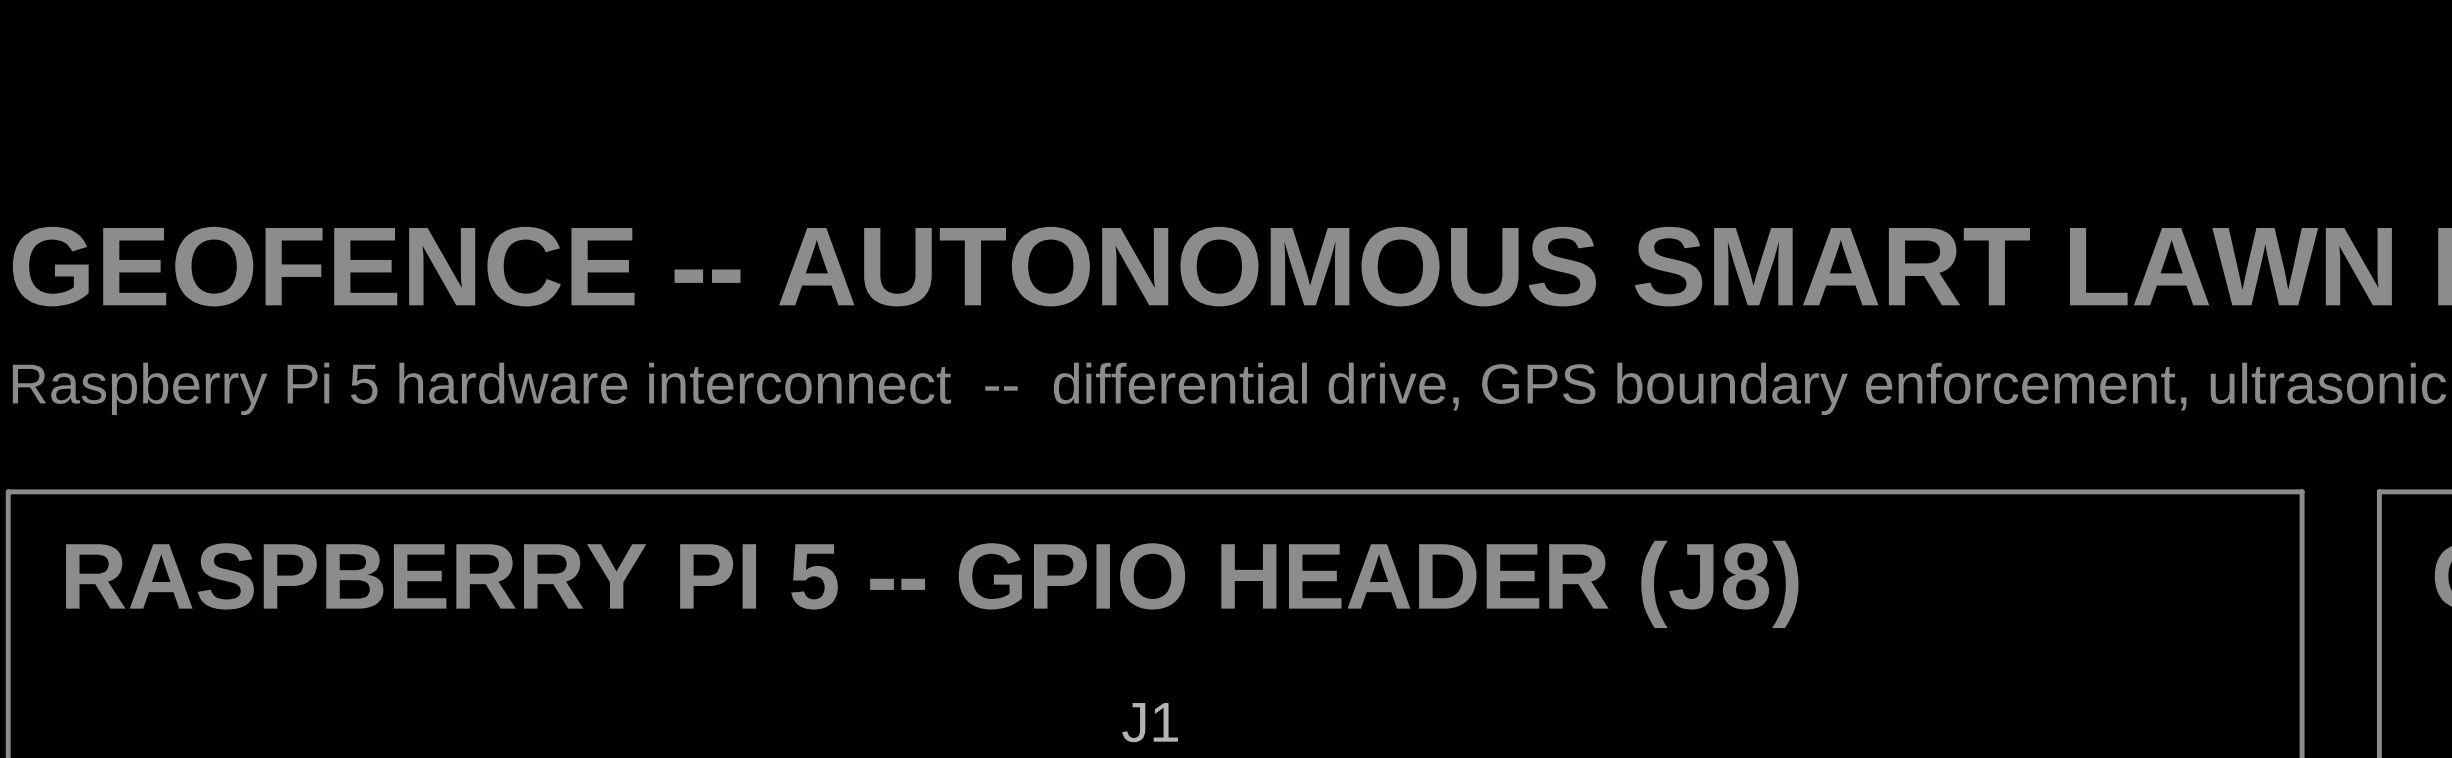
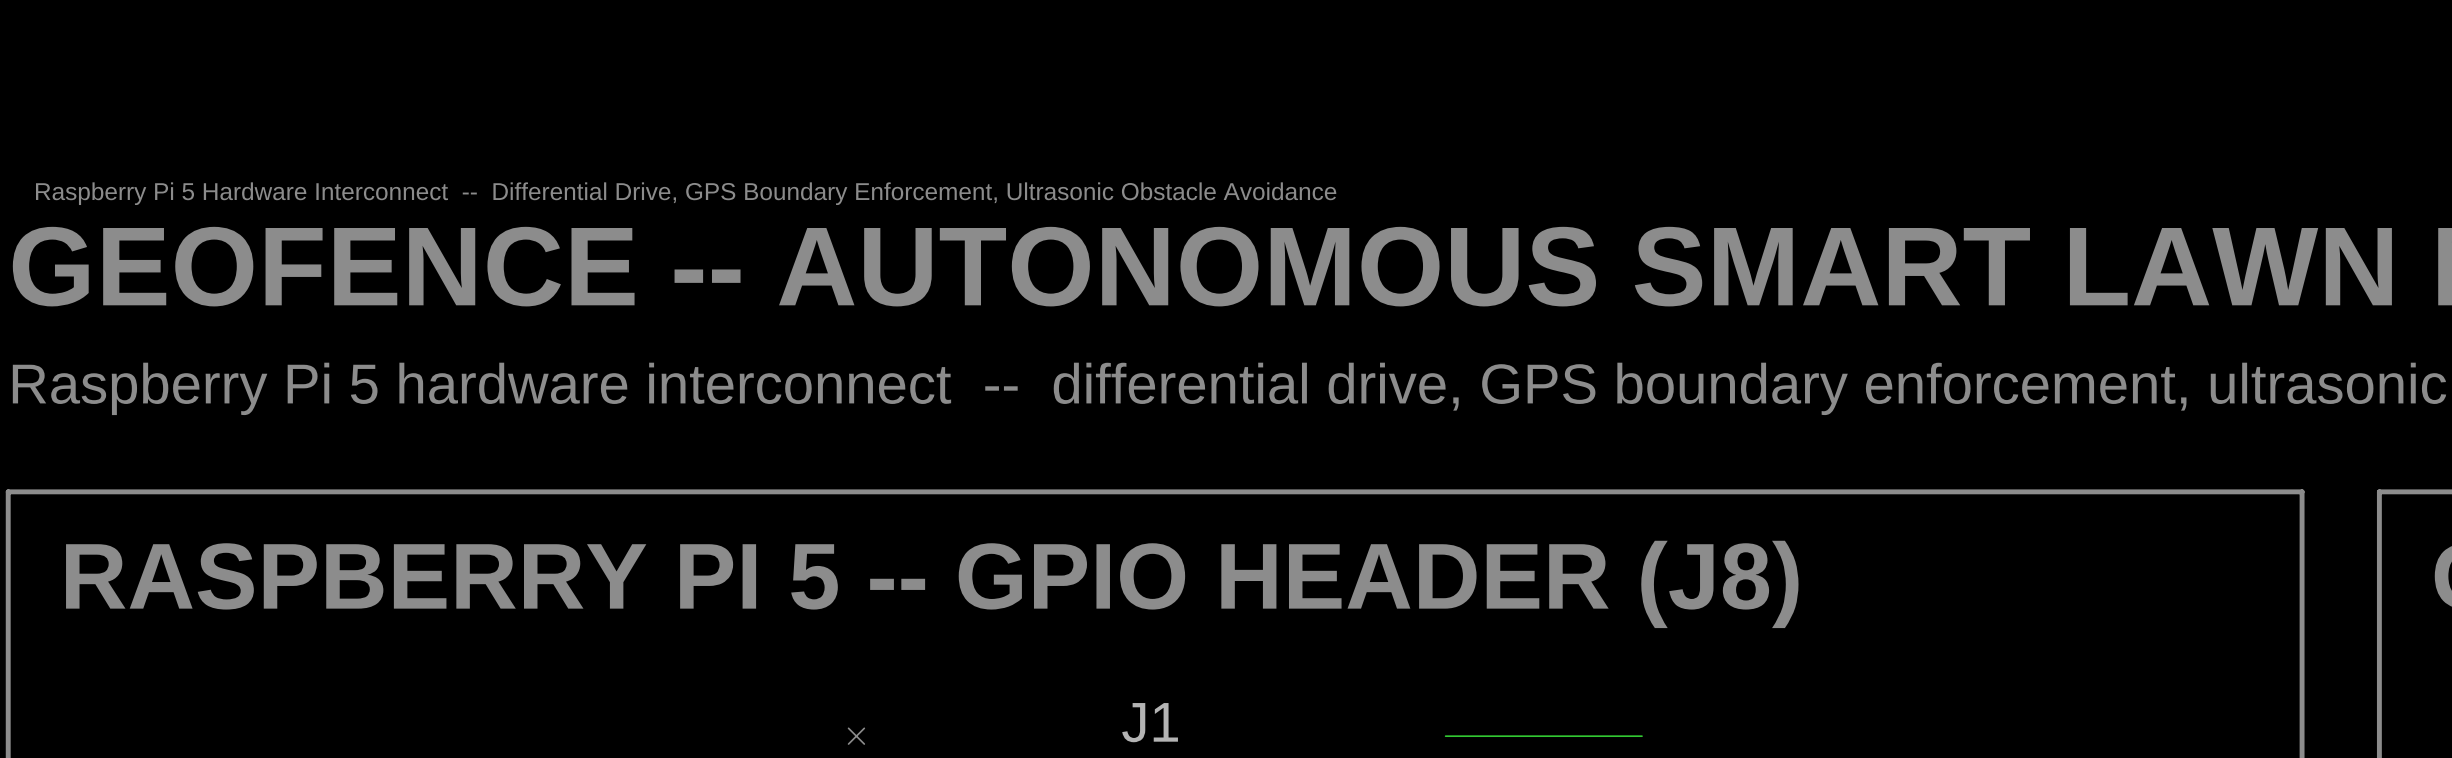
text: none -> Raspberry Pi 5 Hardware Interconnect -- Differential Drive, GPS Boundary Enforcement, Ultrasonic Obstacle Avoidance (686, 193)
no-connect mark: none -> (856, 736)
wire: none -> (1445, 736) (1642, 736)

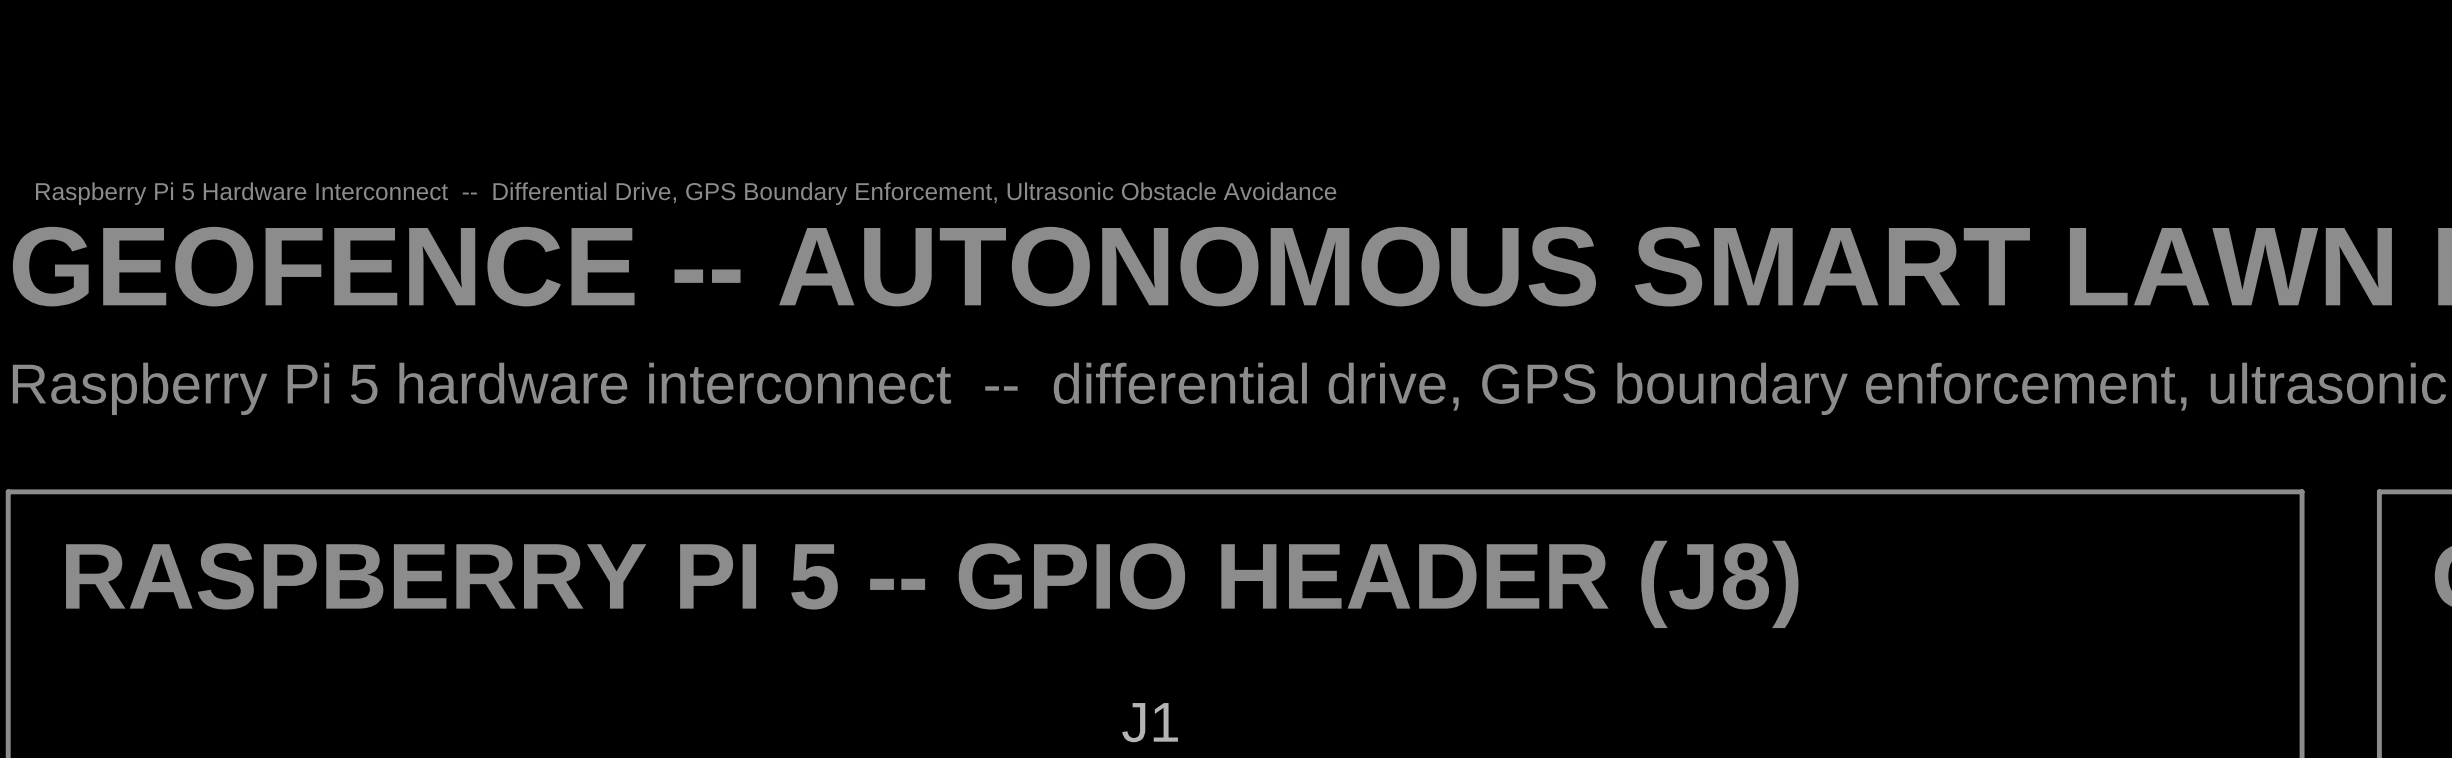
no-connect mark: (856, 736) -> none
wire: (1445, 736) (1642, 736) -> none

